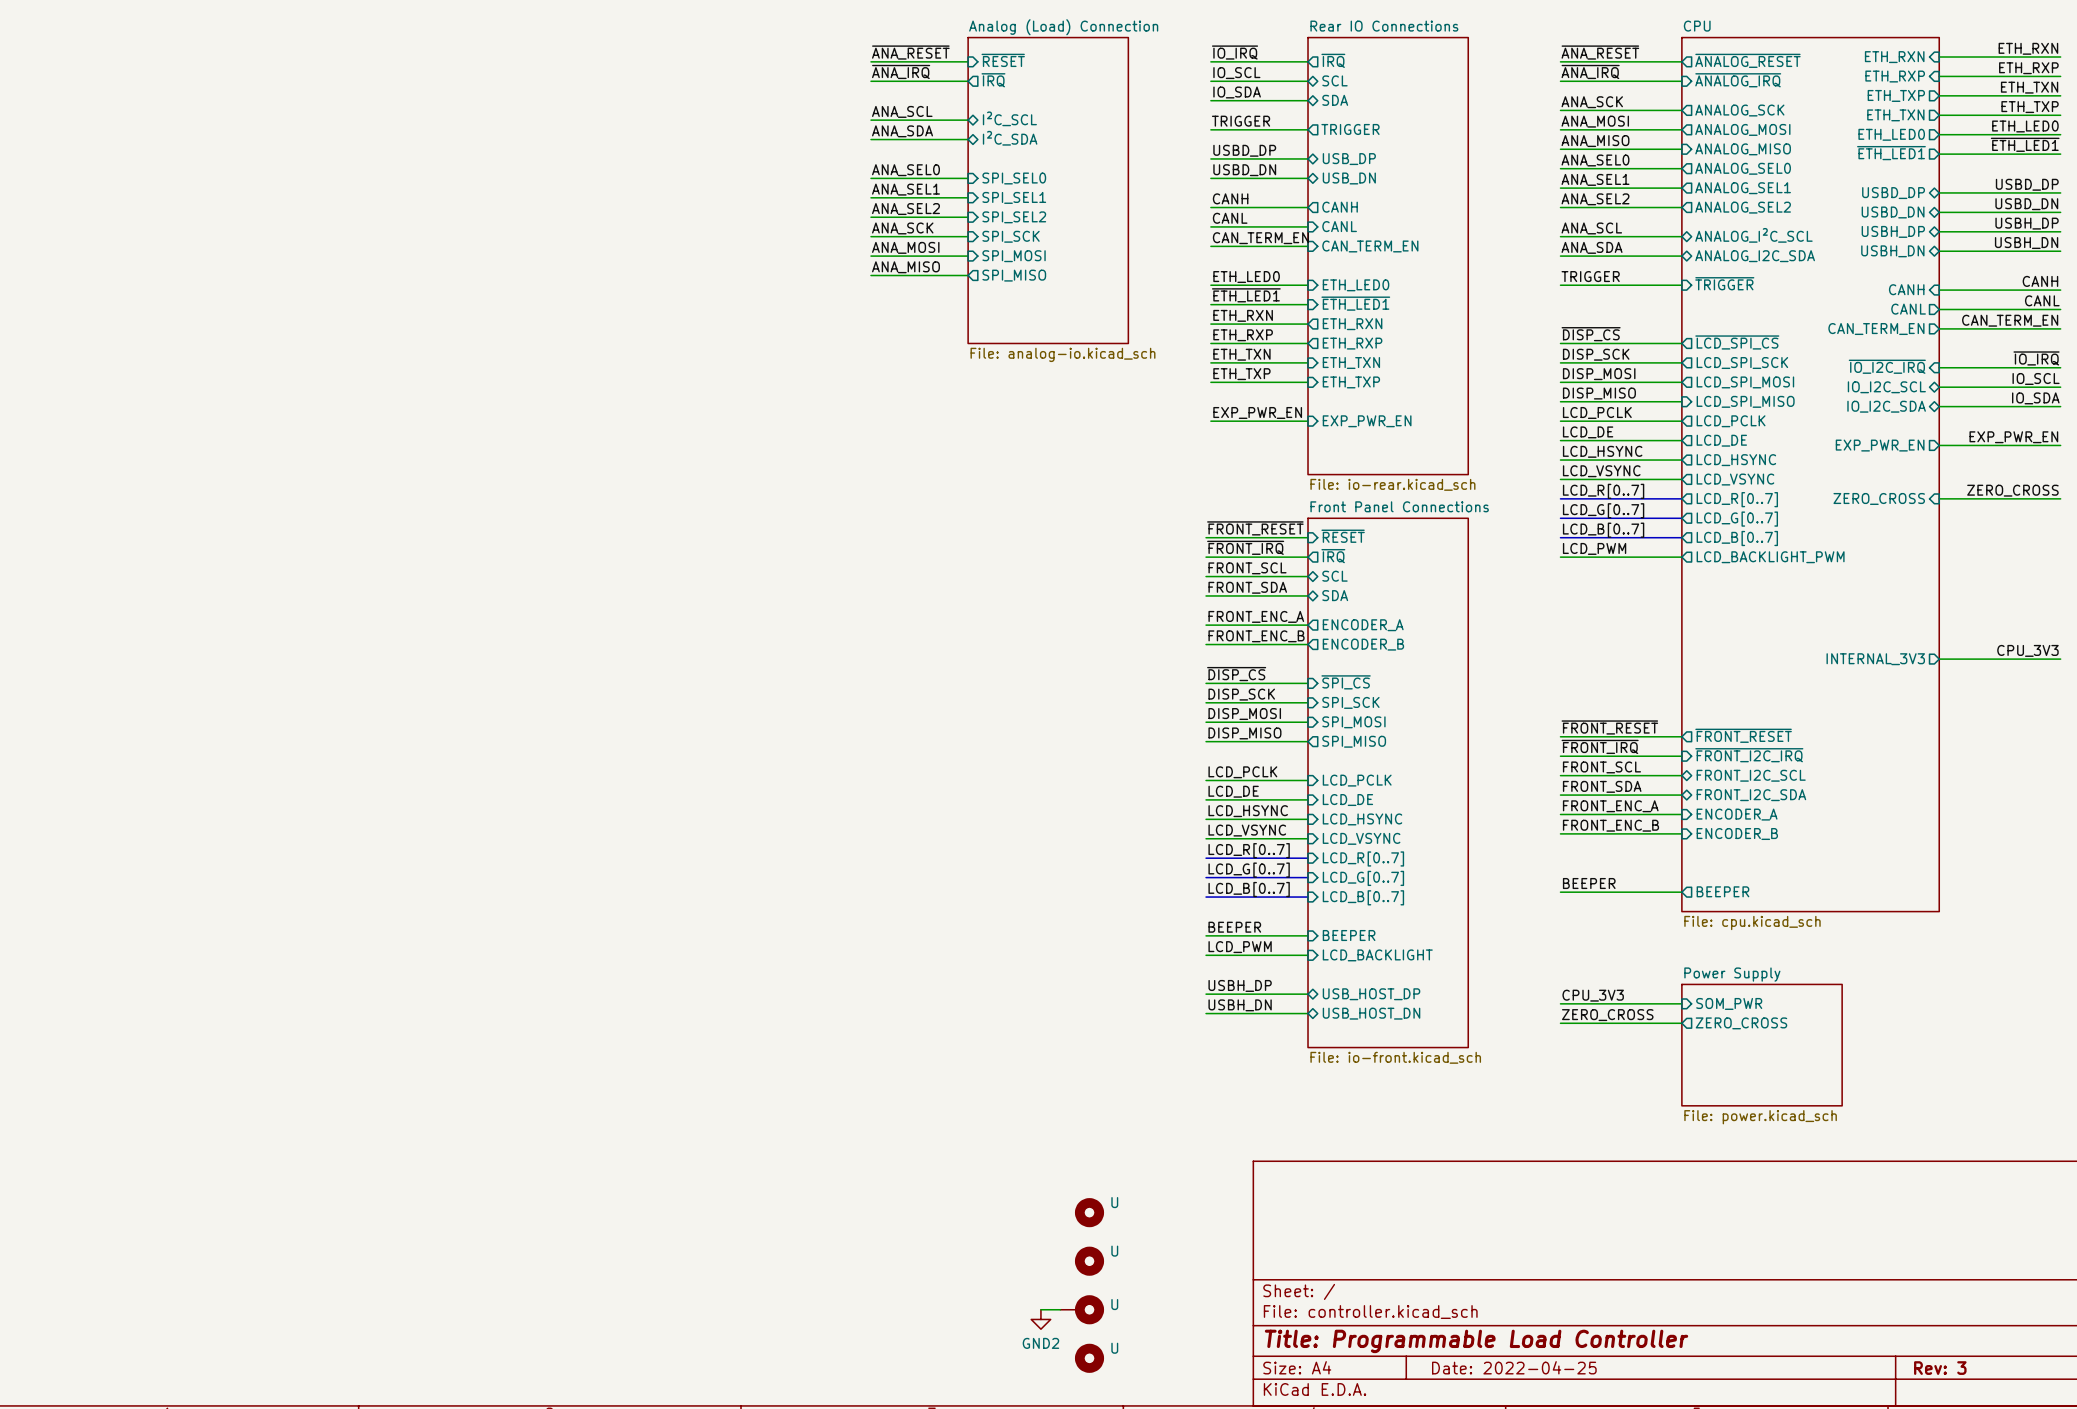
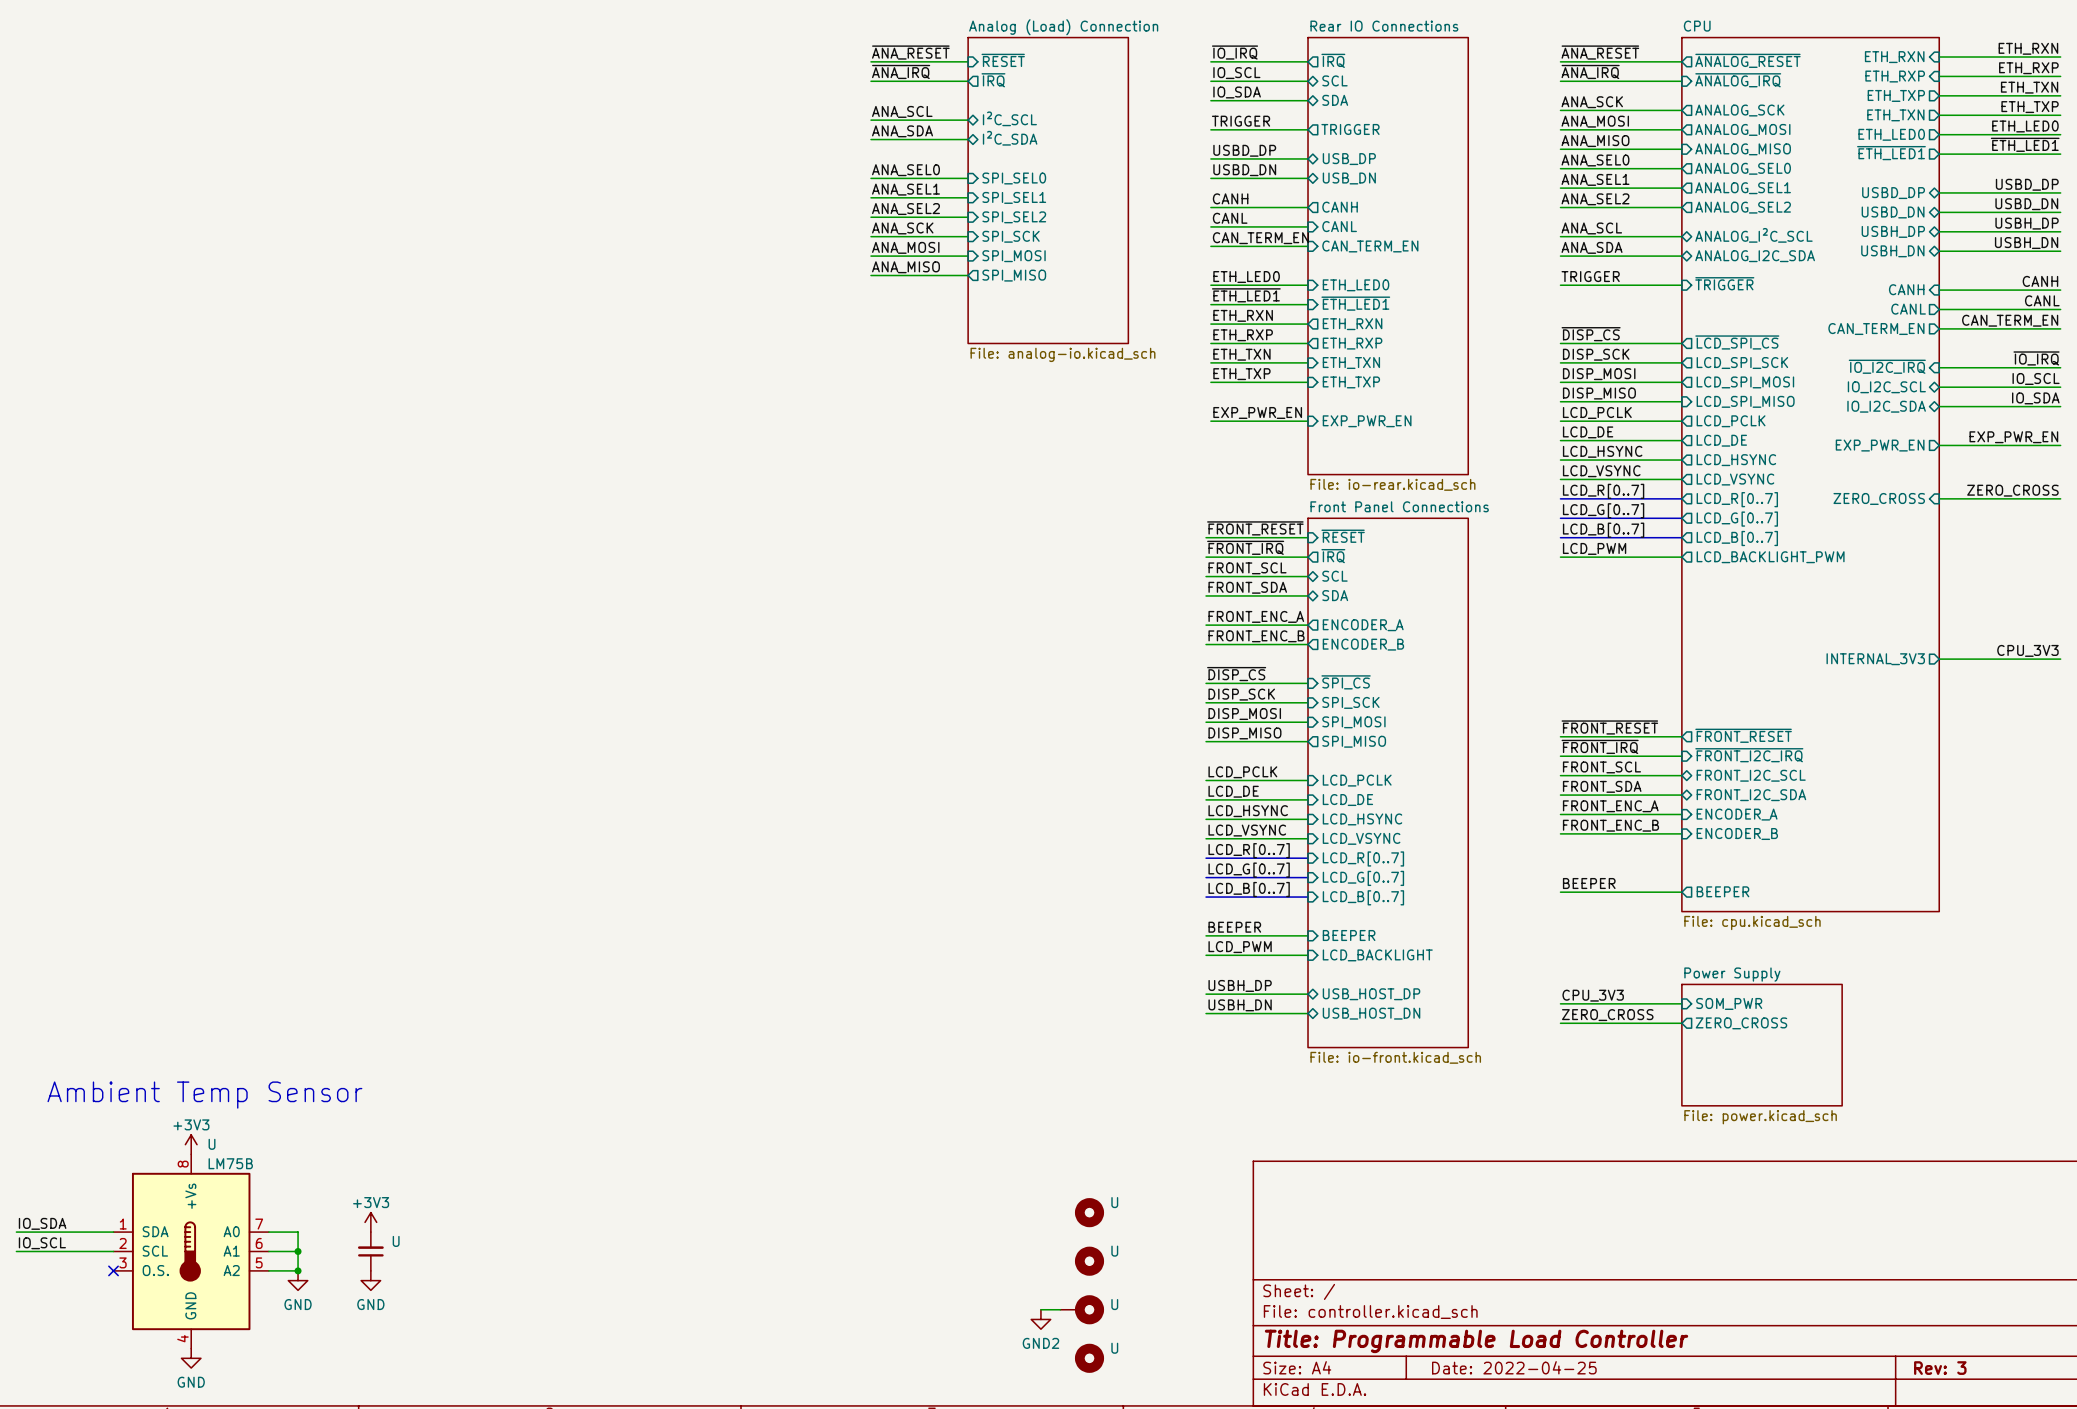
text: none -> Ambient Temp Sensor (204, 1095)
power symbol: none -> +3V3 (191, 1144)
power symbol: none -> +3V3 (370, 1222)
label: none -> IO_SDA (42, 1223)
wire: none -> (16, 1232) (113, 1232)
wire: none -> (268, 1232) (298, 1232) (298, 1270) (268, 1270)
label: none -> IO_SCL (42, 1243)
wire: none -> (16, 1251) (113, 1251)
U: none -> LM75B (191, 1251)
wire: none -> (268, 1251) (298, 1251)
junction: none -> (298, 1251)
U: none -> (370, 1251)
no-connect mark: none -> (113, 1270)
junction: none -> (298, 1270)
power symbol: none -> GND (298, 1280)
power symbol: none -> GND (370, 1280)
power symbol: none -> GND (191, 1358)

